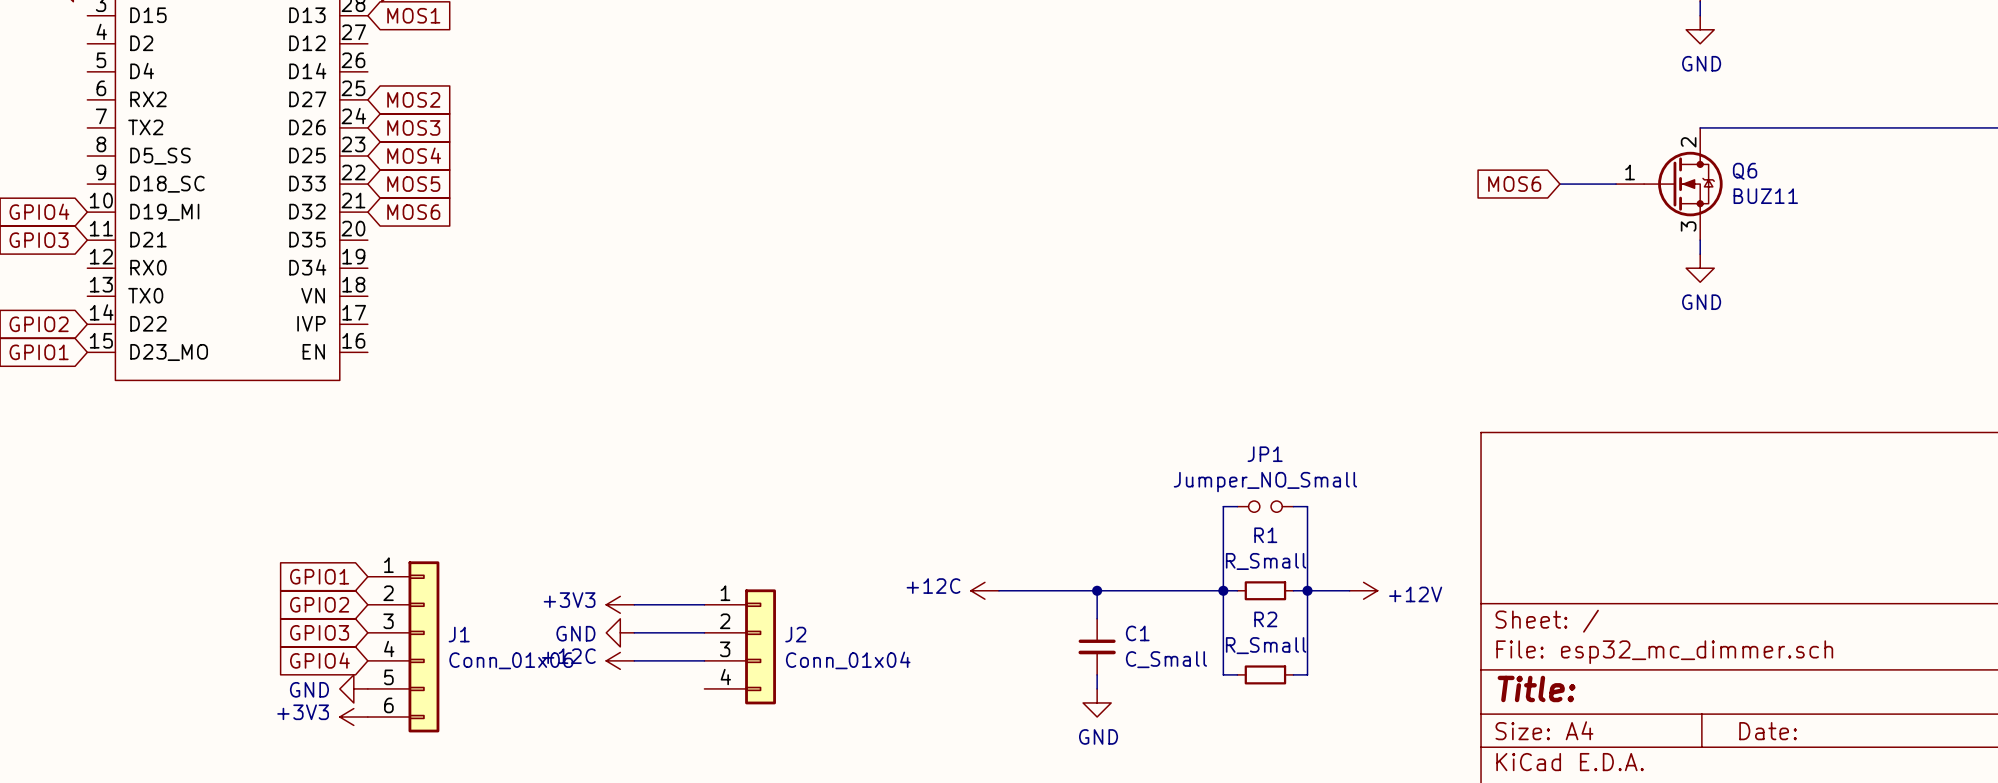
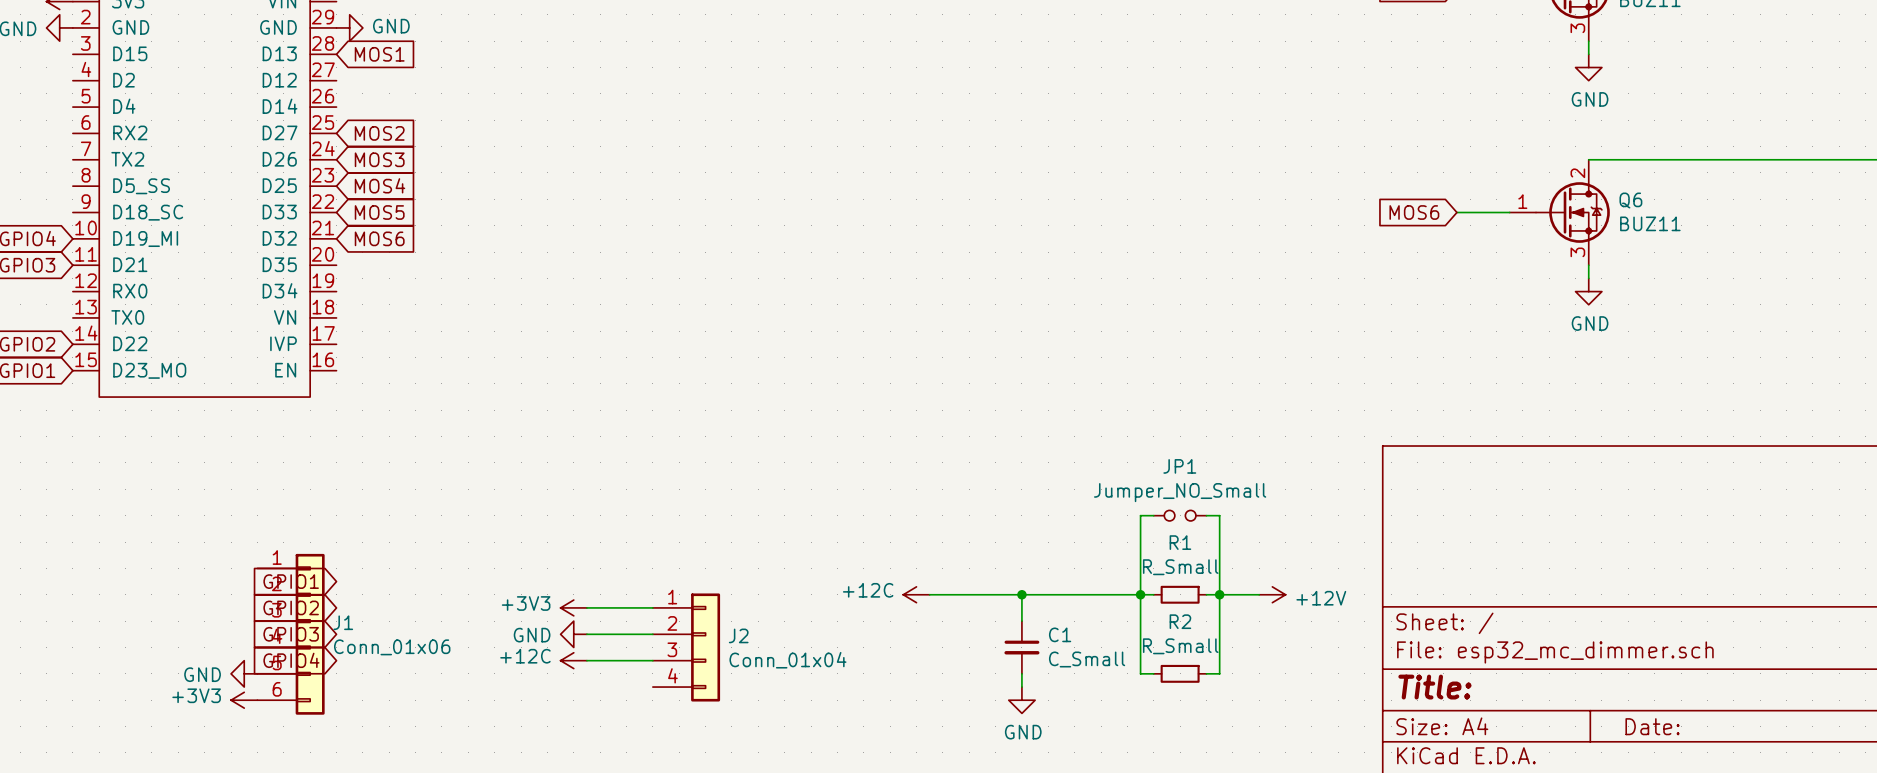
J1 position: (403, 646) -> (291, 634)
power symbol position: GND (353, 688) -> GND (244, 673)
power symbol position: +3V3 (353, 717) -> +3V3 (244, 700)

